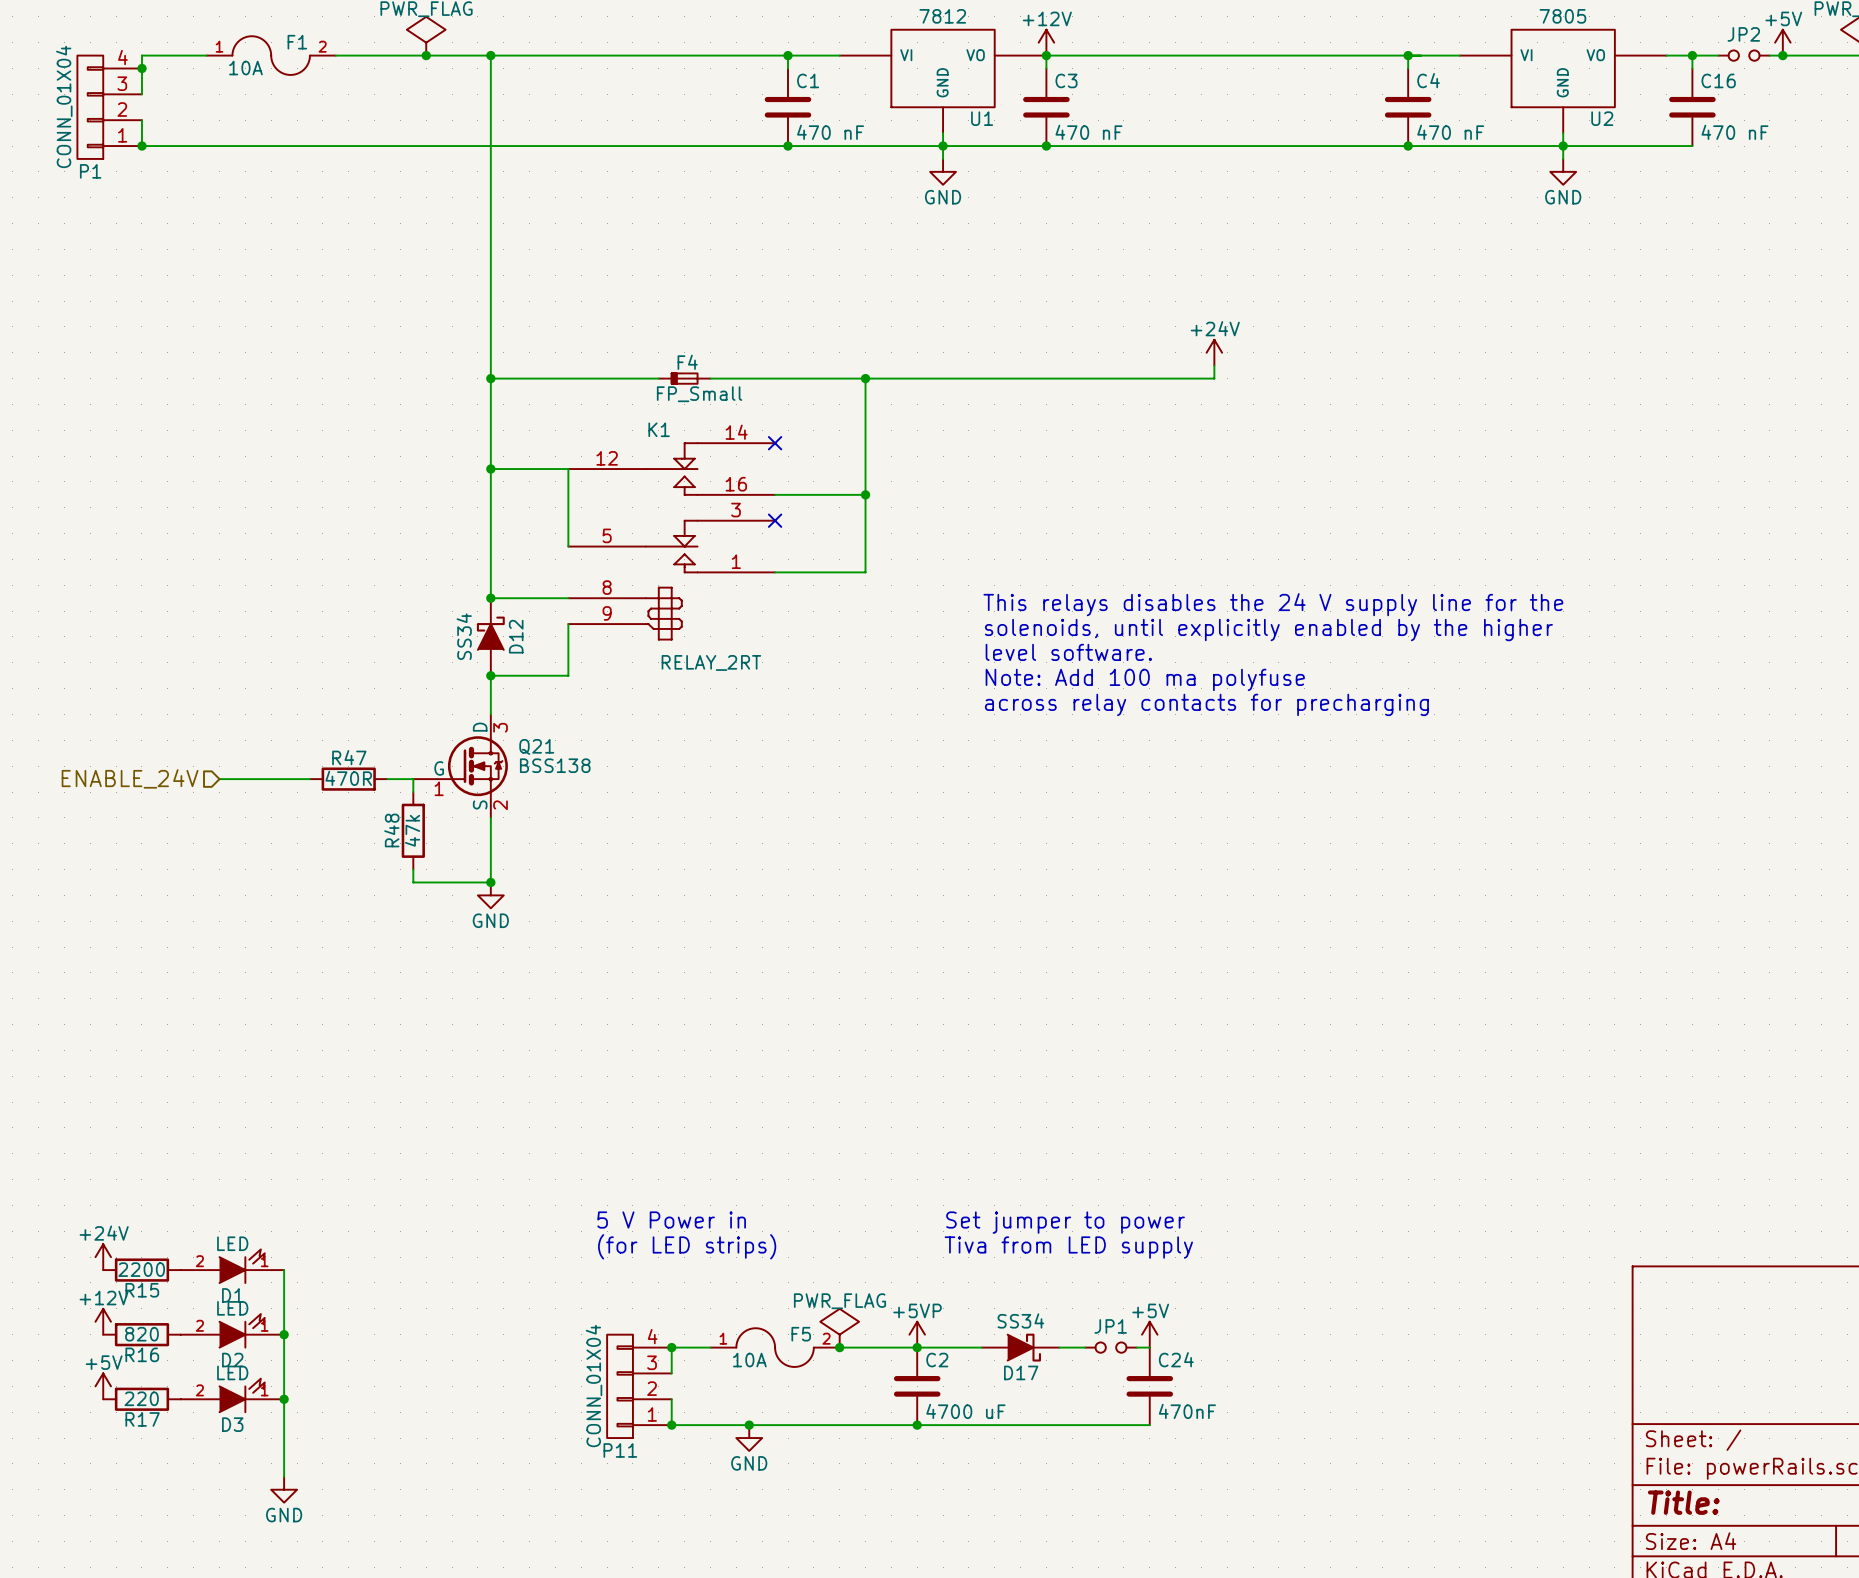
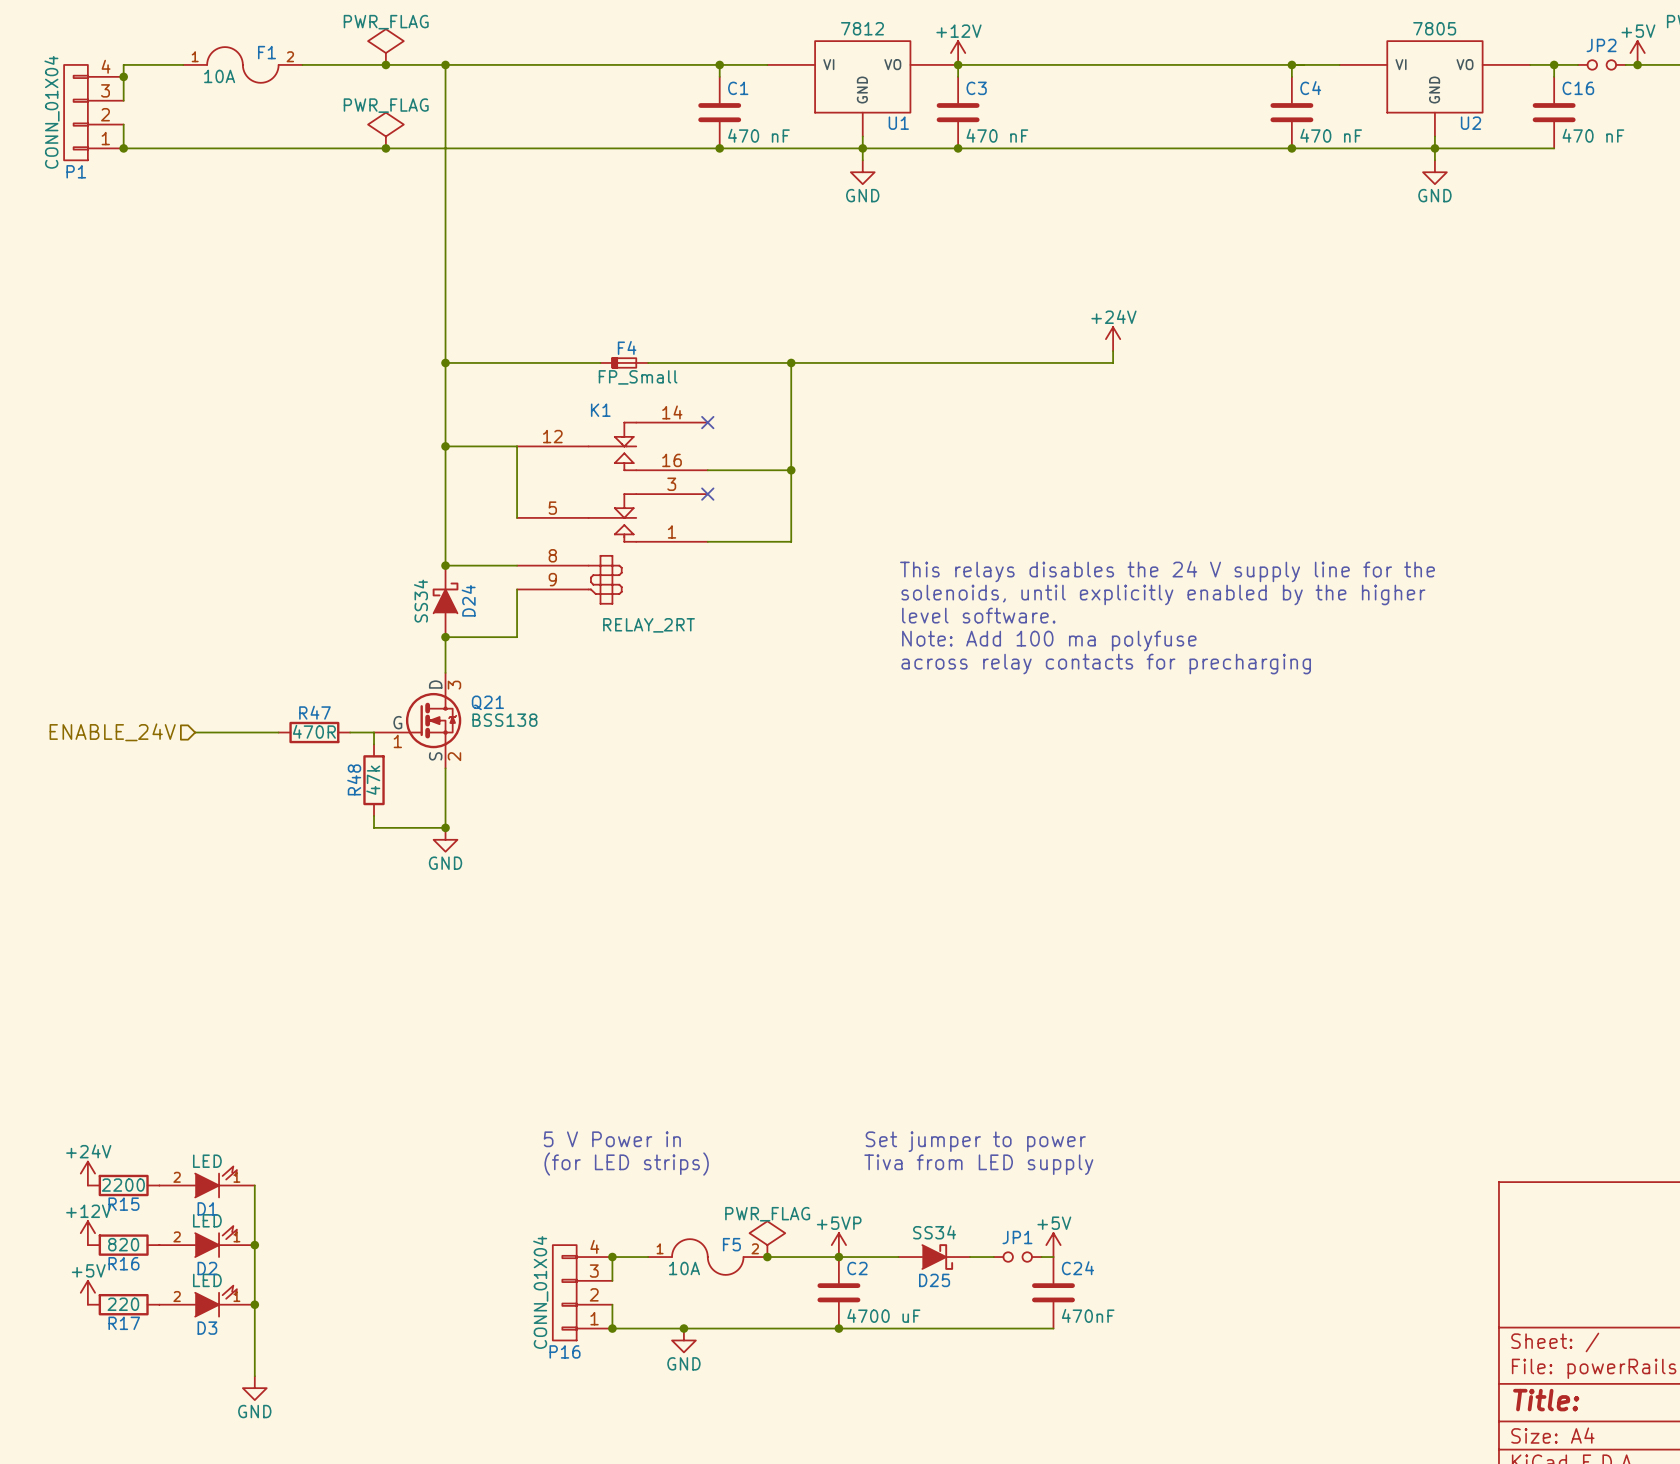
power symbol: none -> PWR_FLAG (385, 130)
junction: none -> (385, 148)
D12 name: D12 (516, 636) -> D24 (468, 600)
D17 name: D17 (1021, 1372) -> D25 (934, 1280)
P11 name: P11 (620, 1450) -> P16 (565, 1351)

